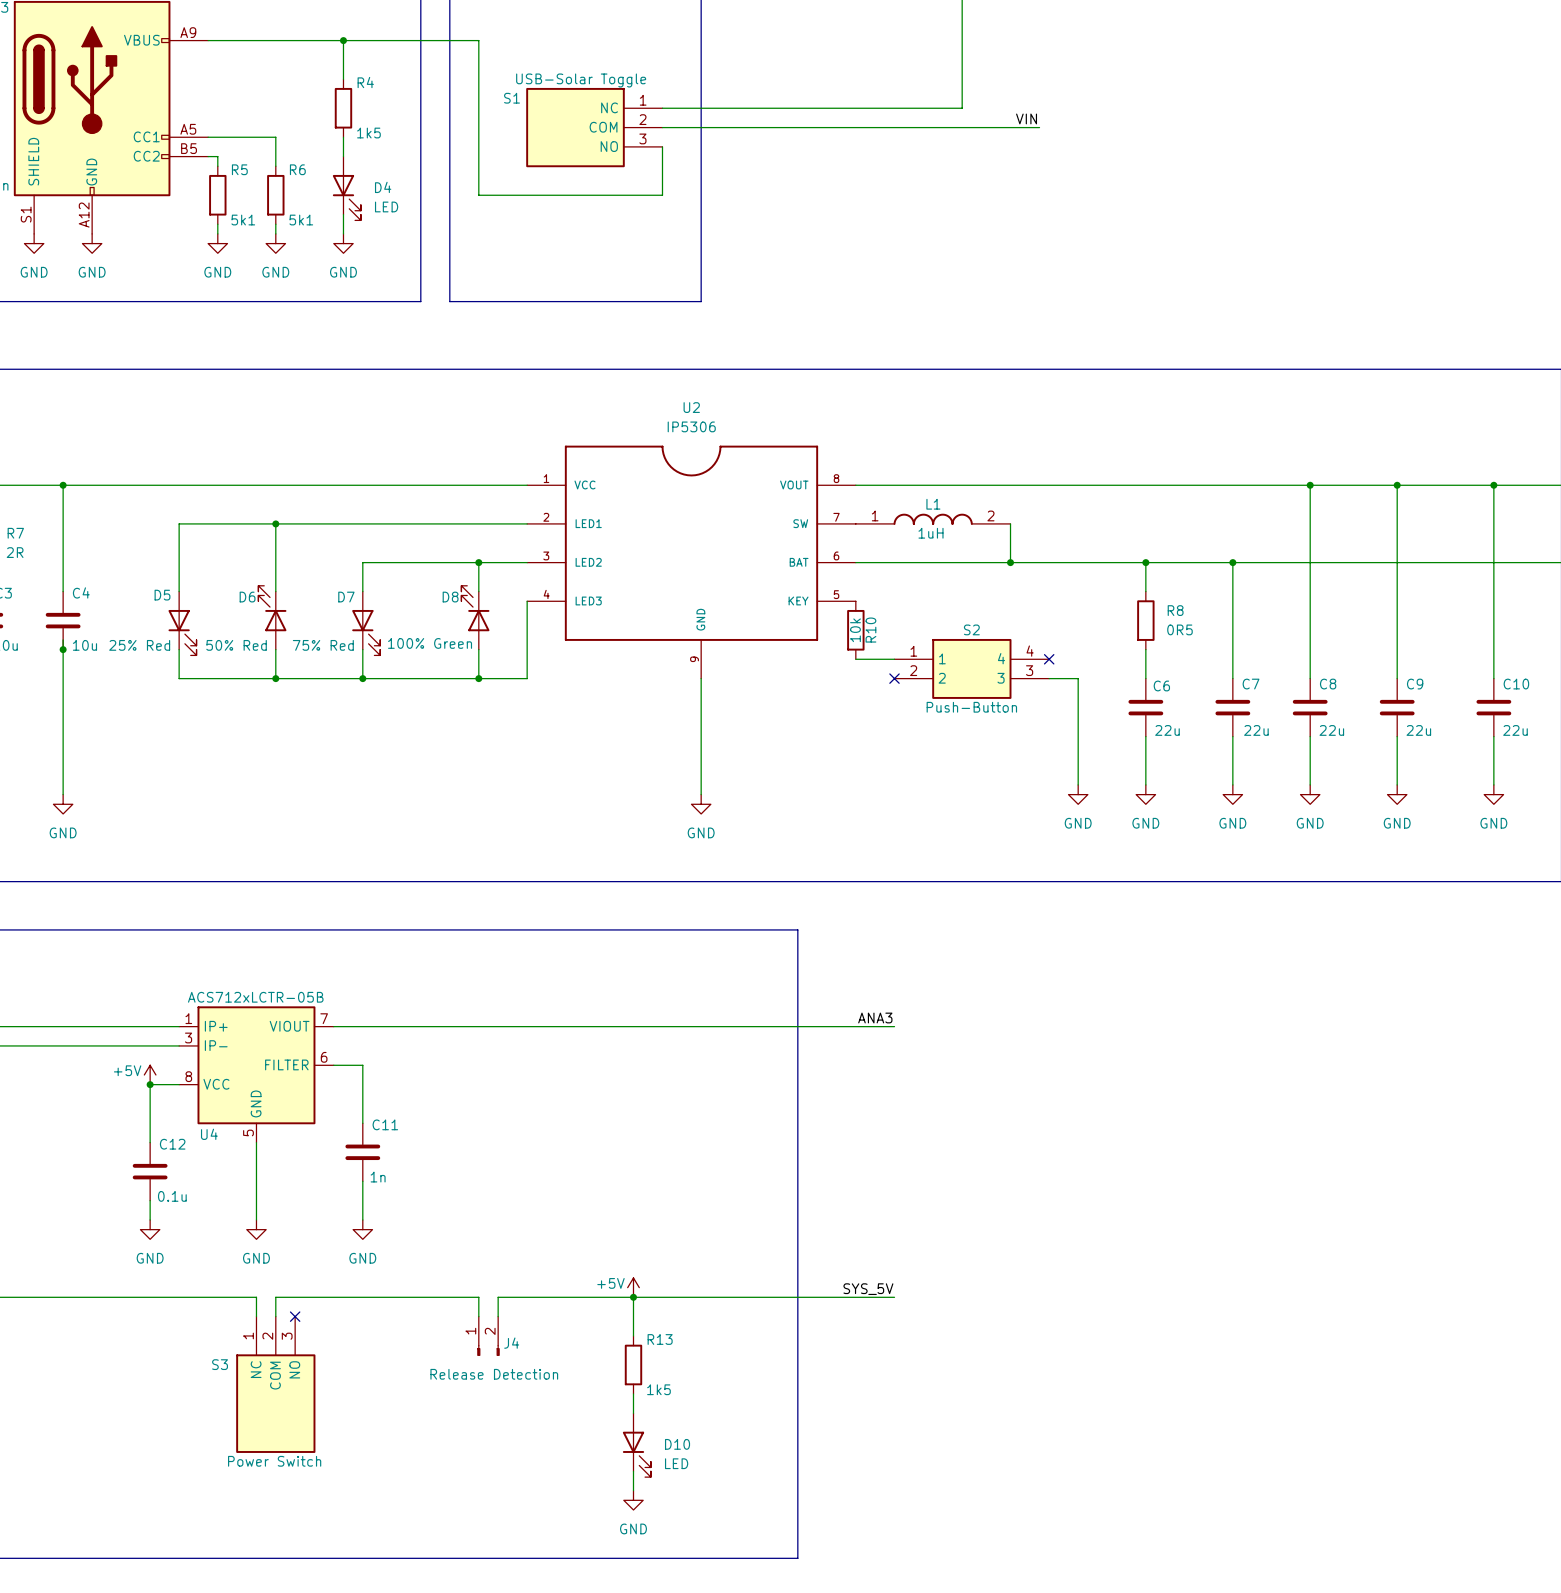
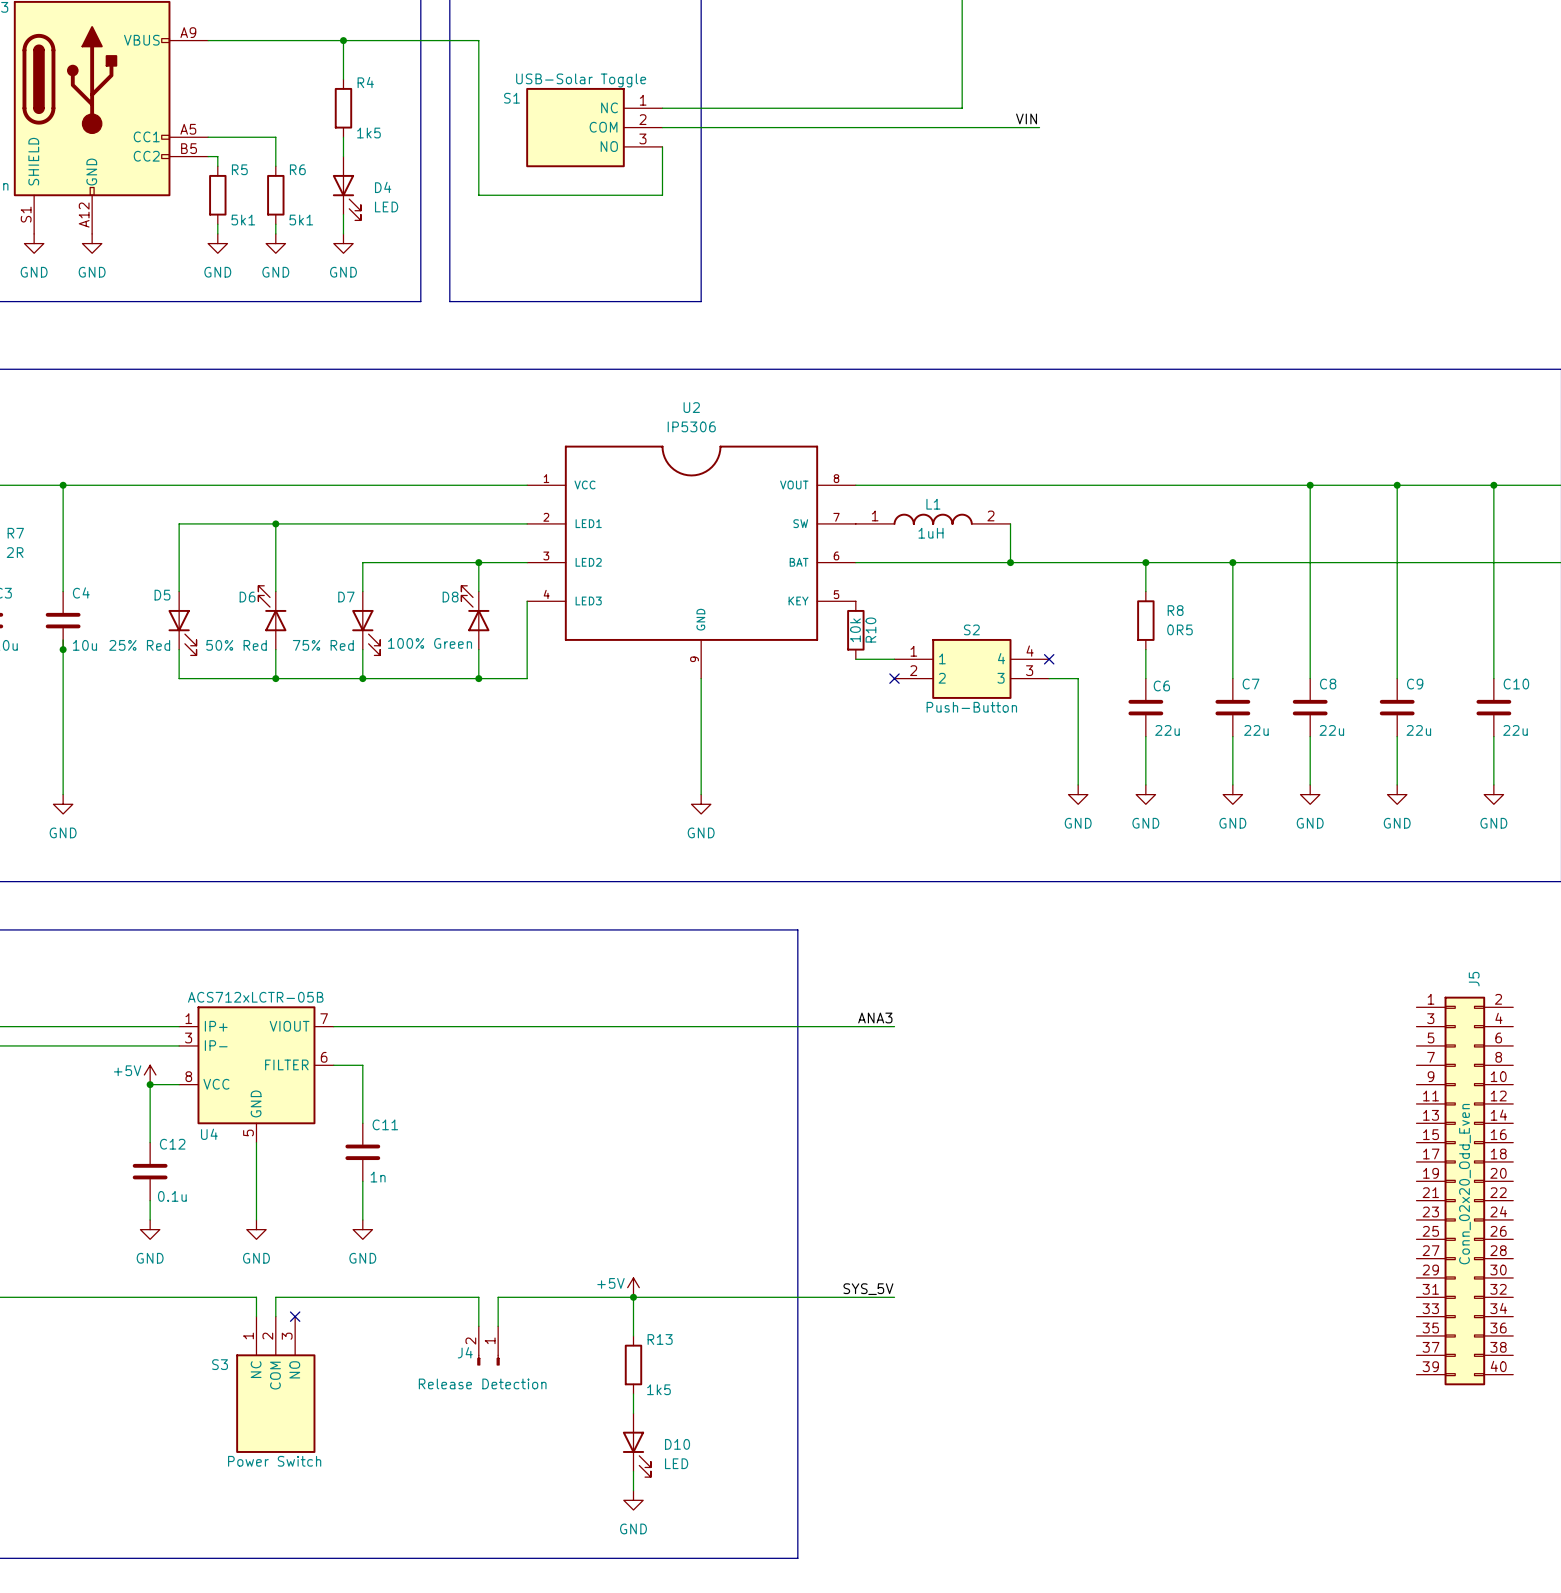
J5: none -> Conn_02x20_Odd_Even (1464, 1190)
J4 flip: as is (488, 1350) -> left-right (488, 1360)

